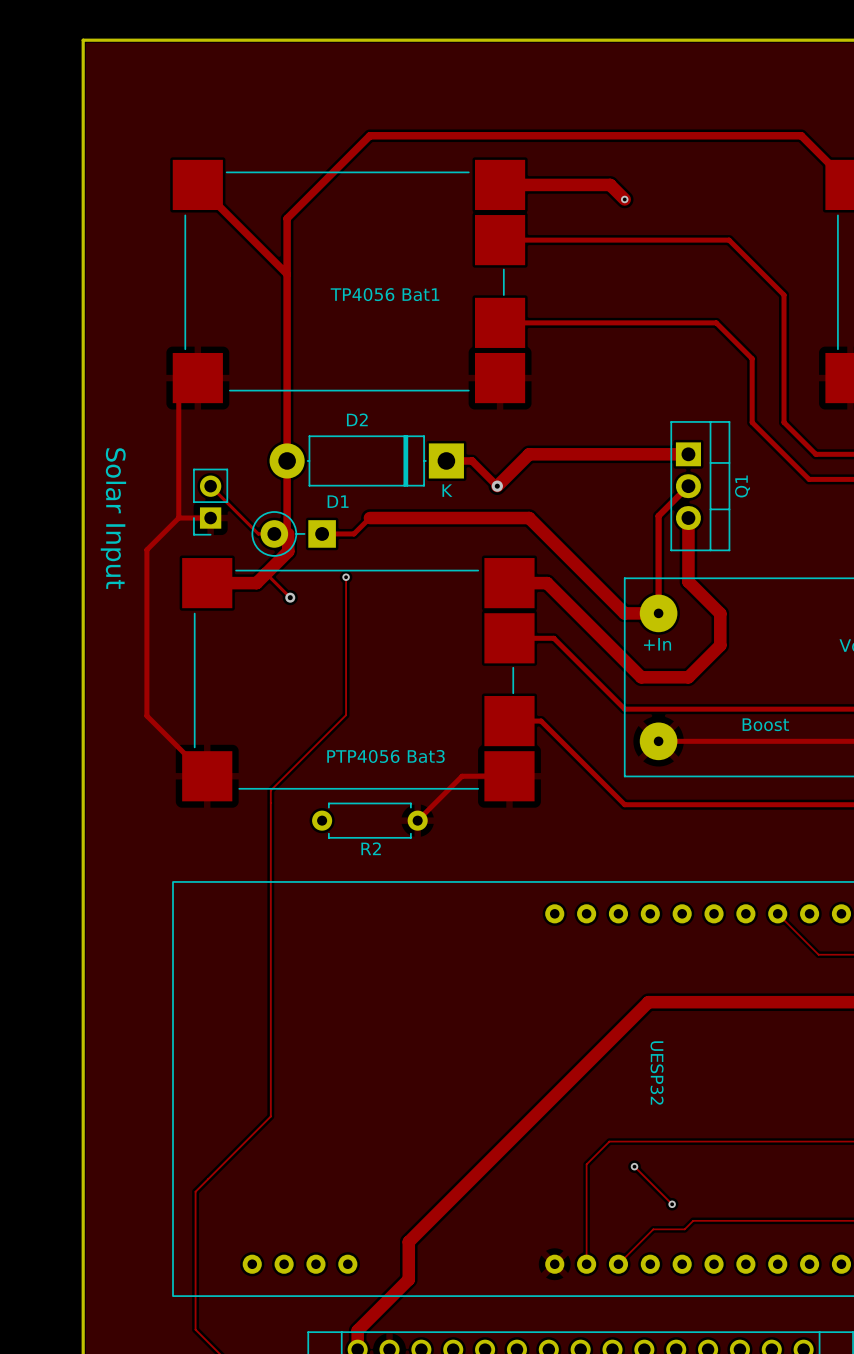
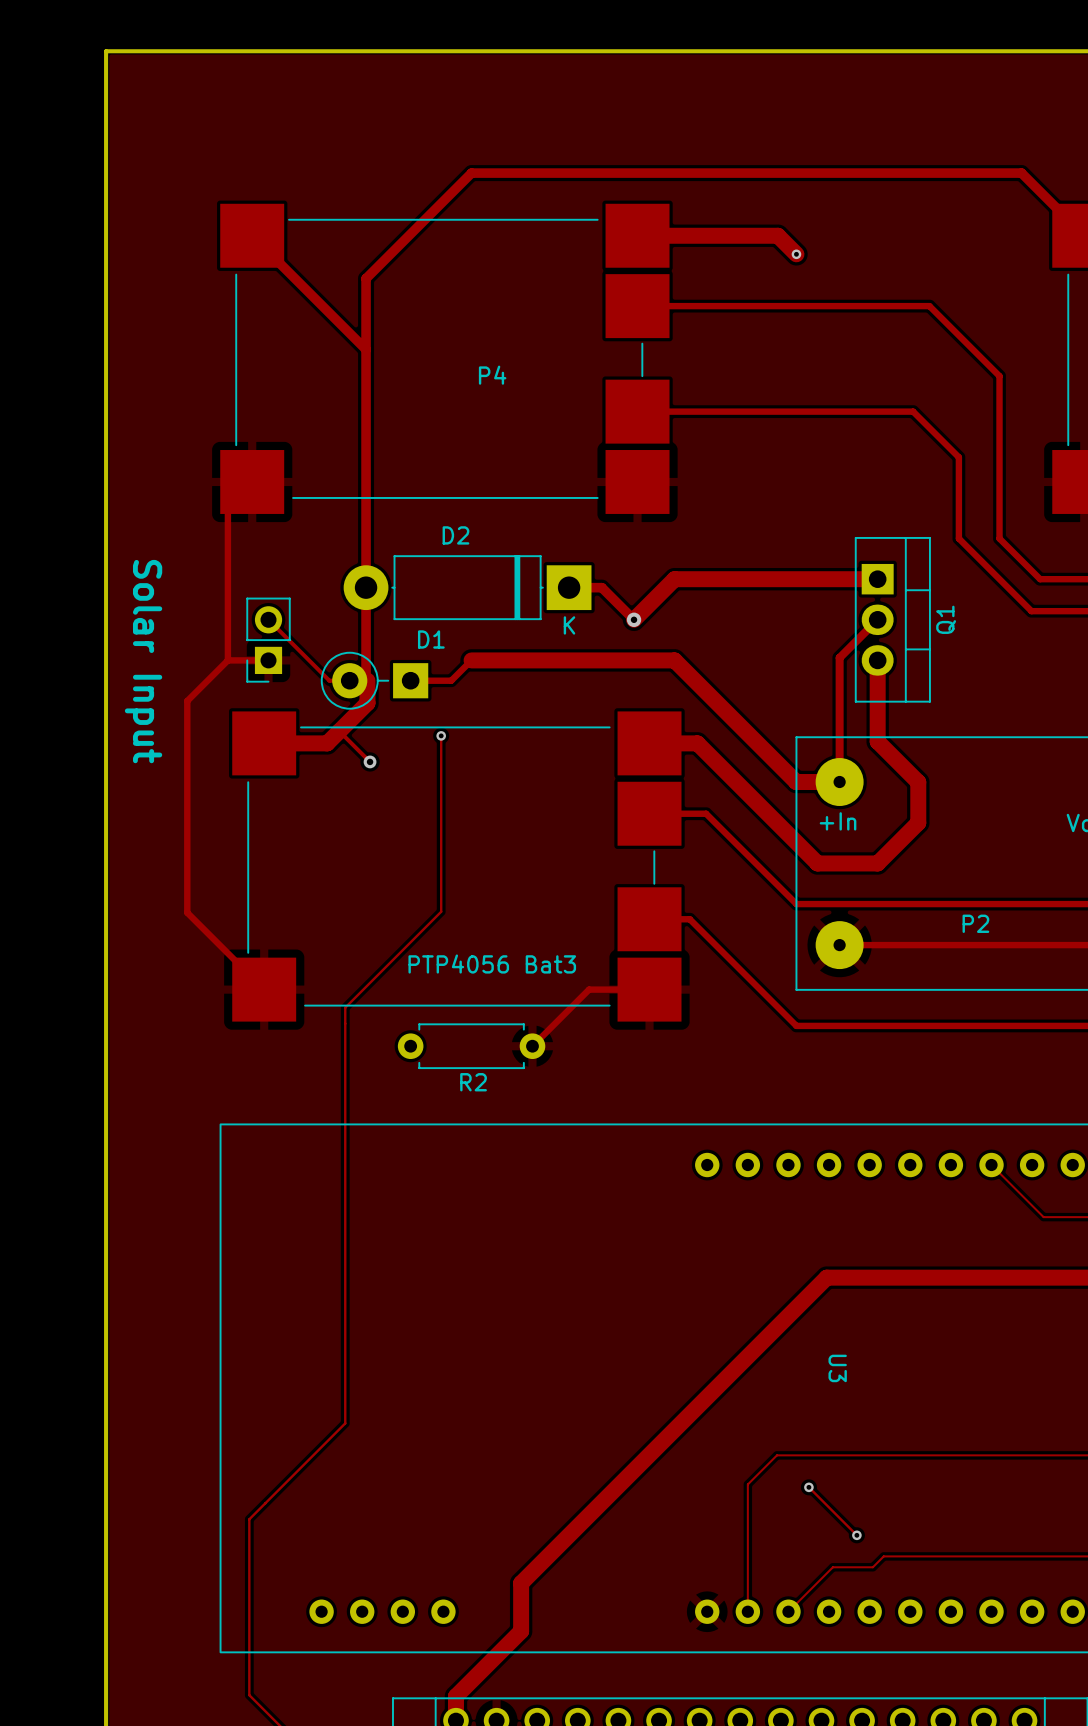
TP4056 Bat1 name: TP4056 Bat1 (385, 294) -> P4 (492, 375)
Boost name: Boost (765, 724) -> P2 (975, 923)
UESP32 name: UESP32 (657, 1072) -> U3 (837, 1368)

